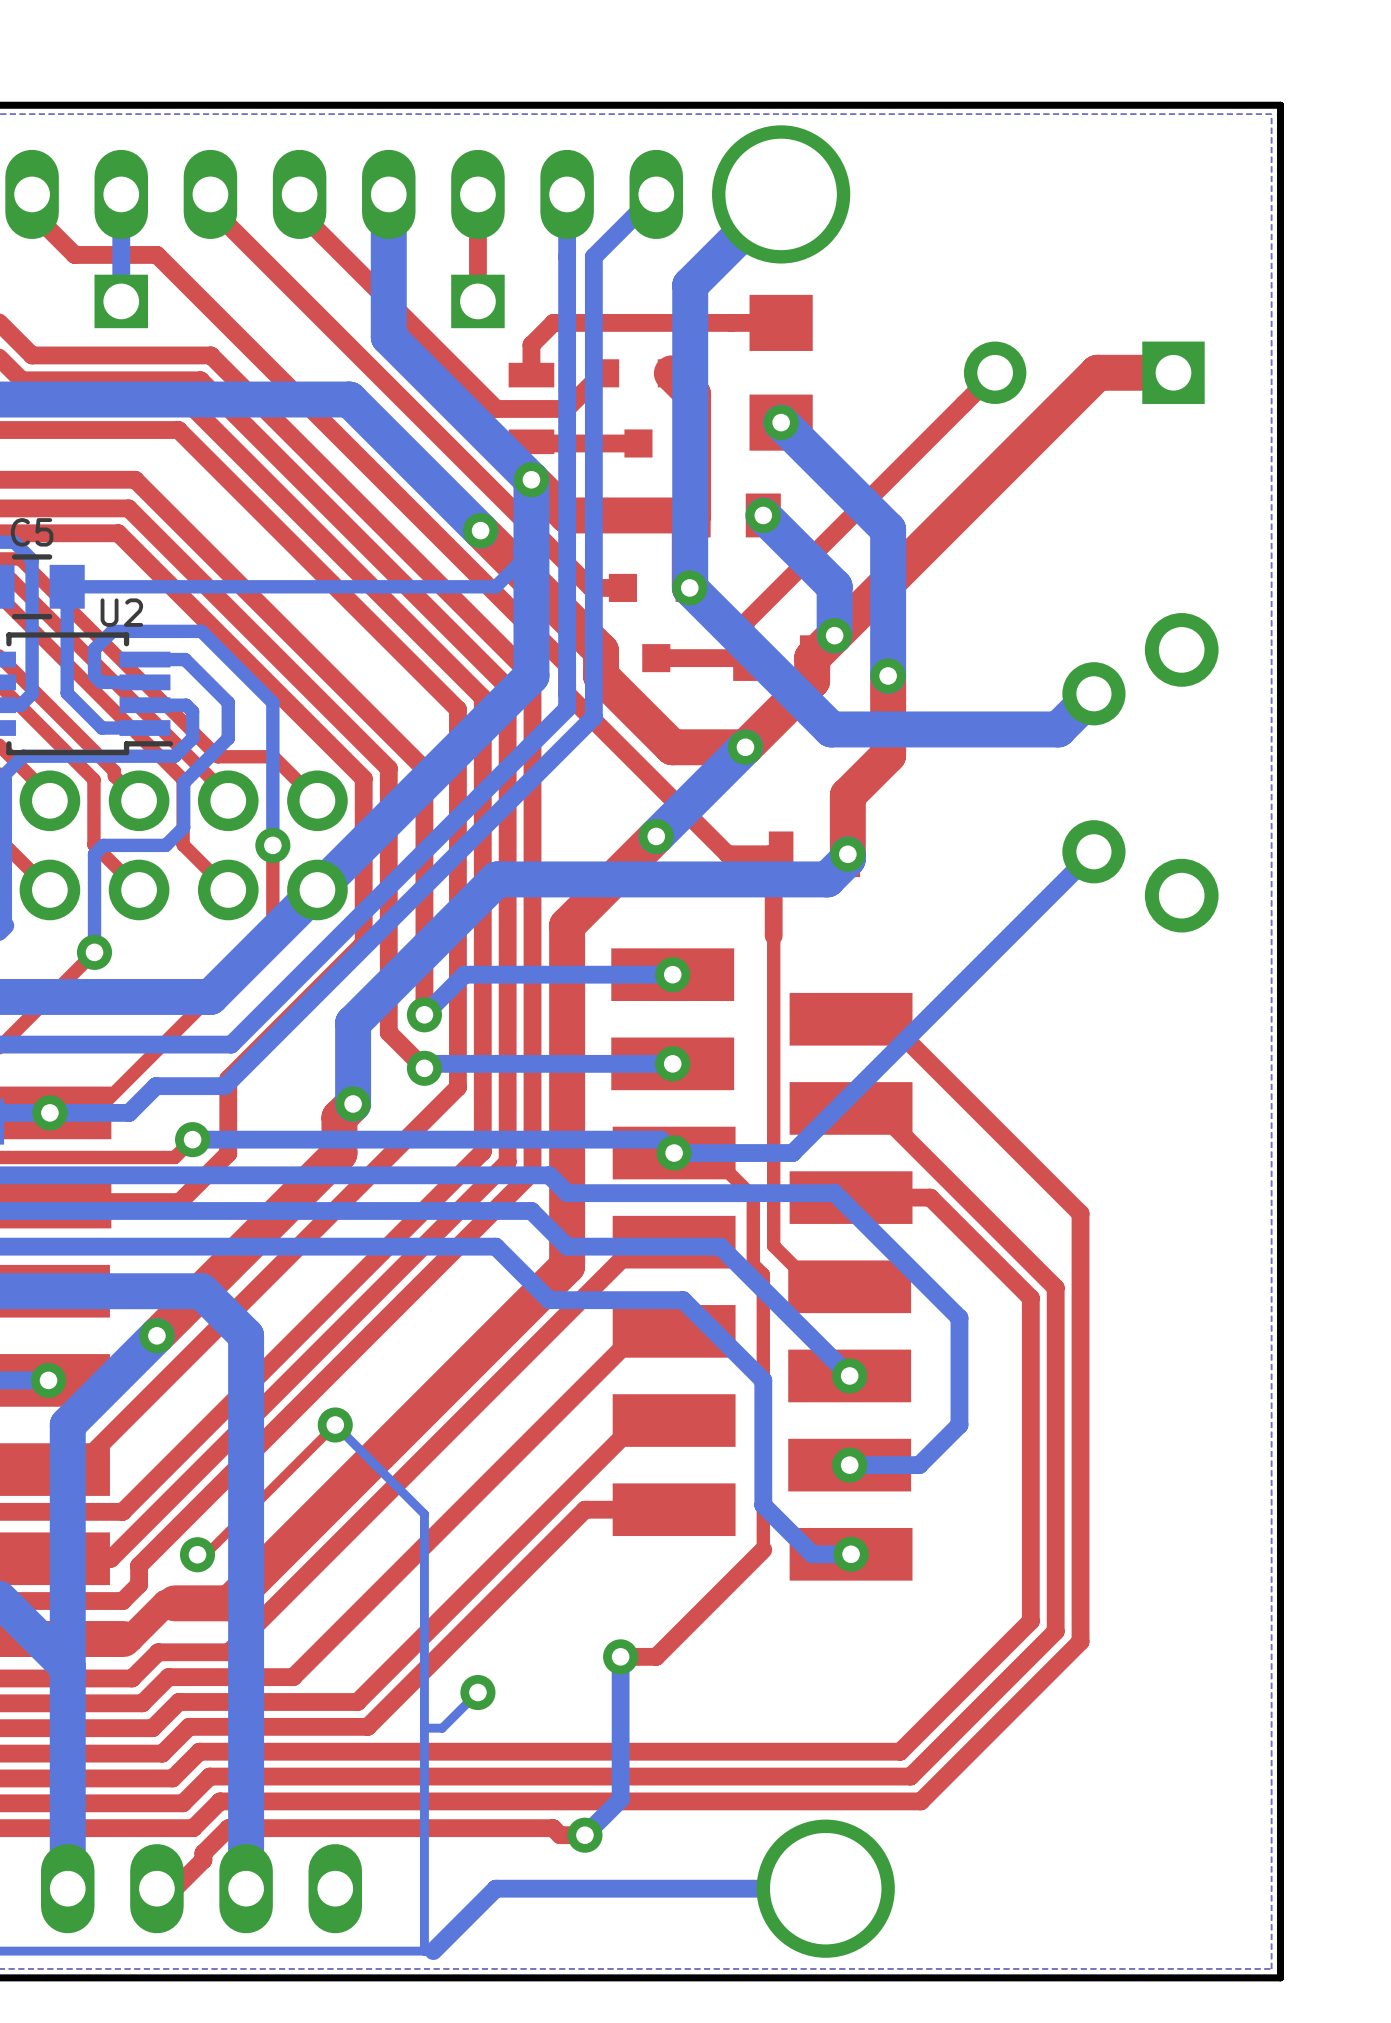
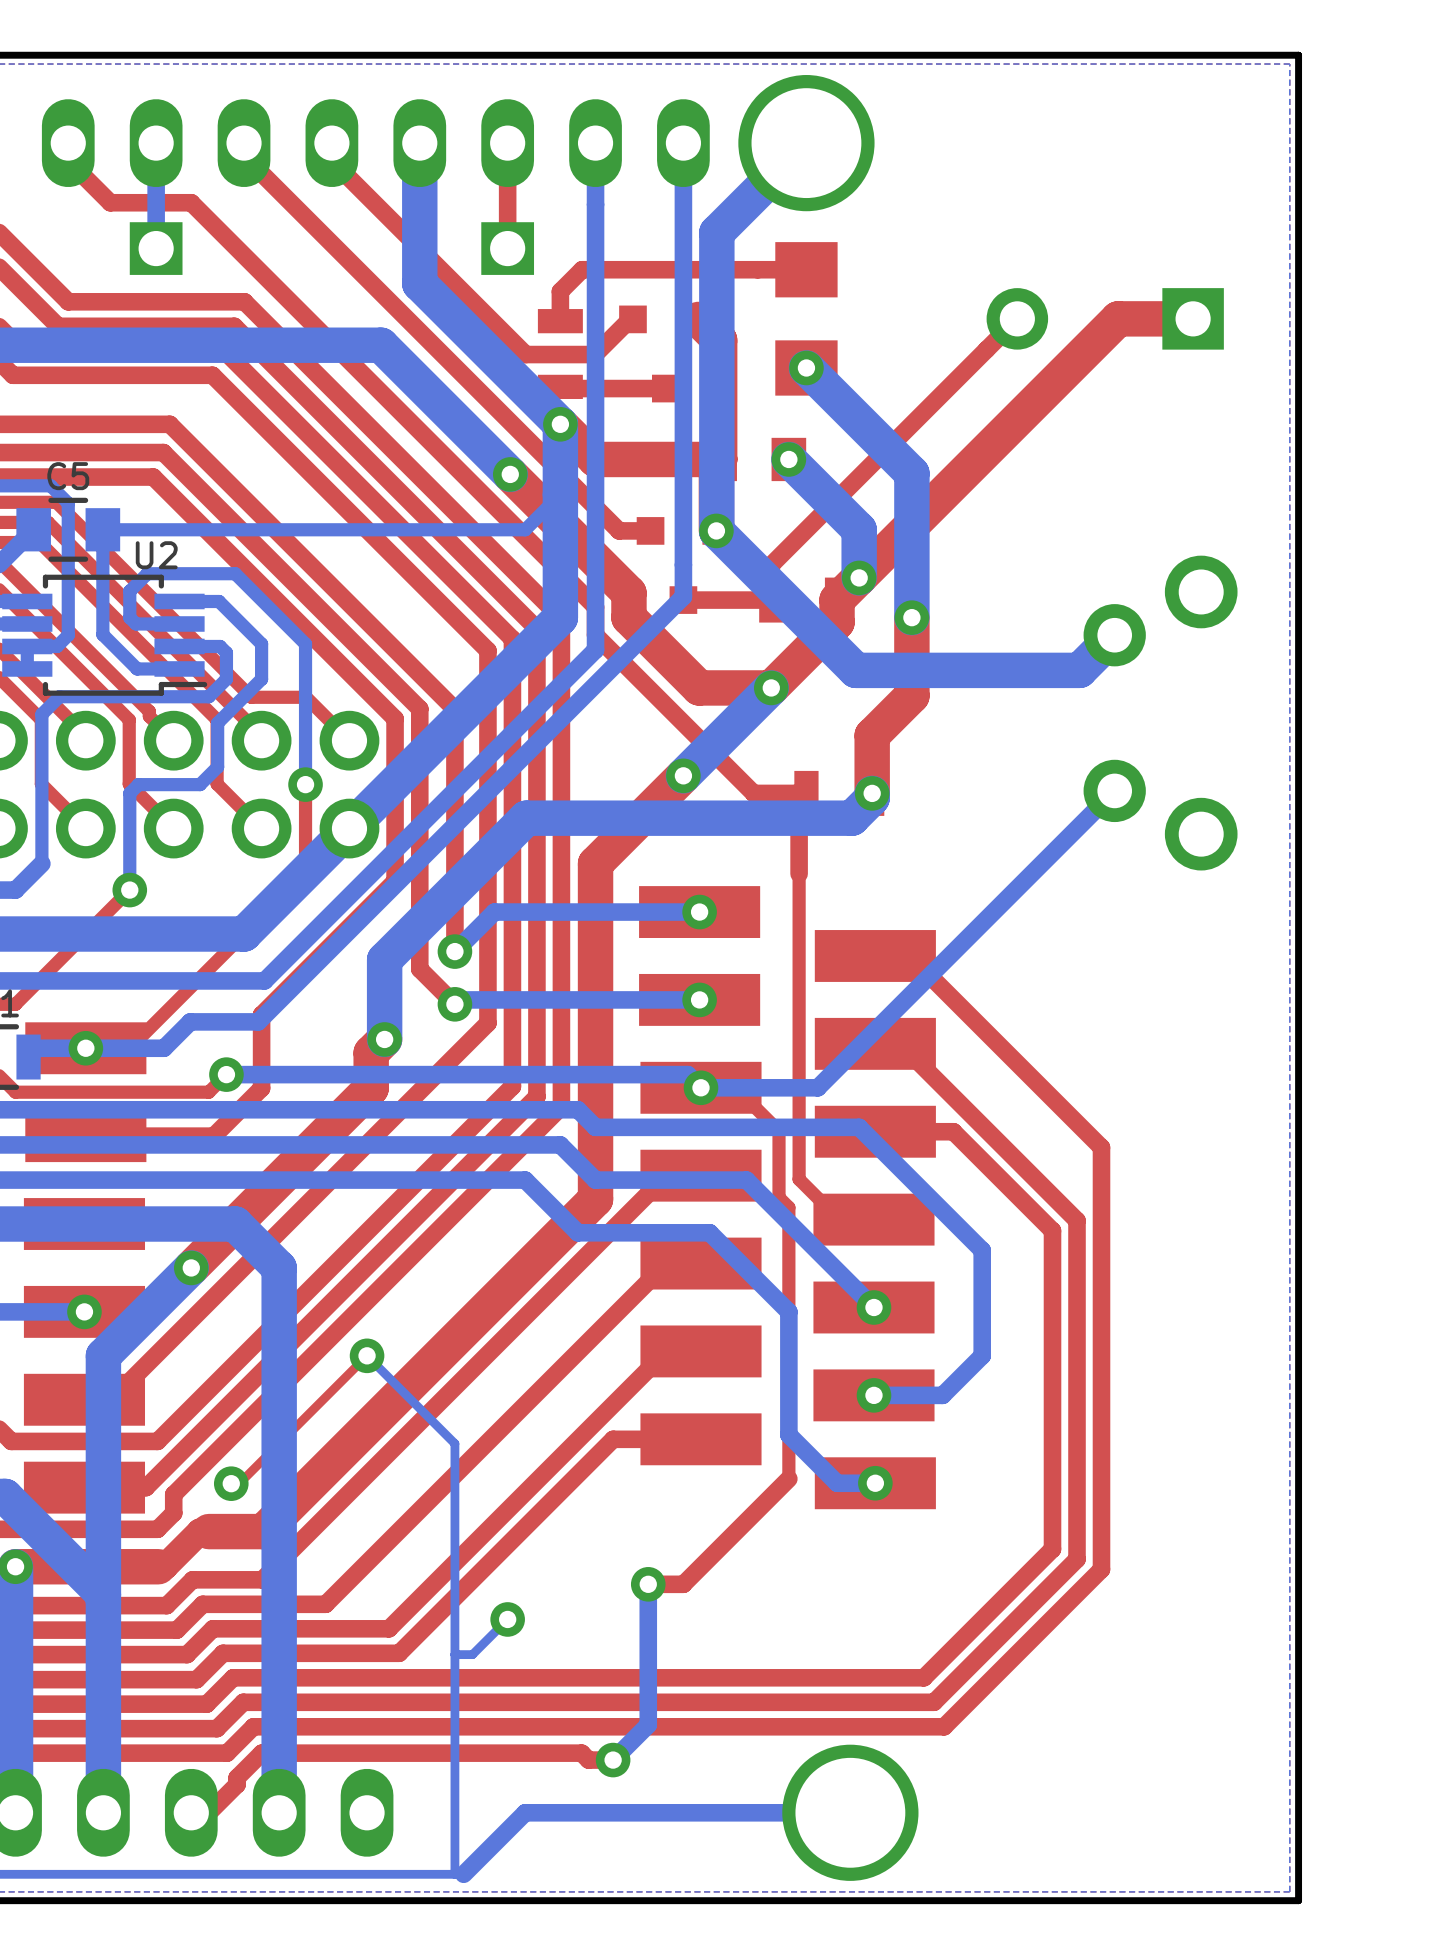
bottom track: (656, 194) (593, 256) (593, 717) -> (683, 143) (683, 596) (621, 658)

